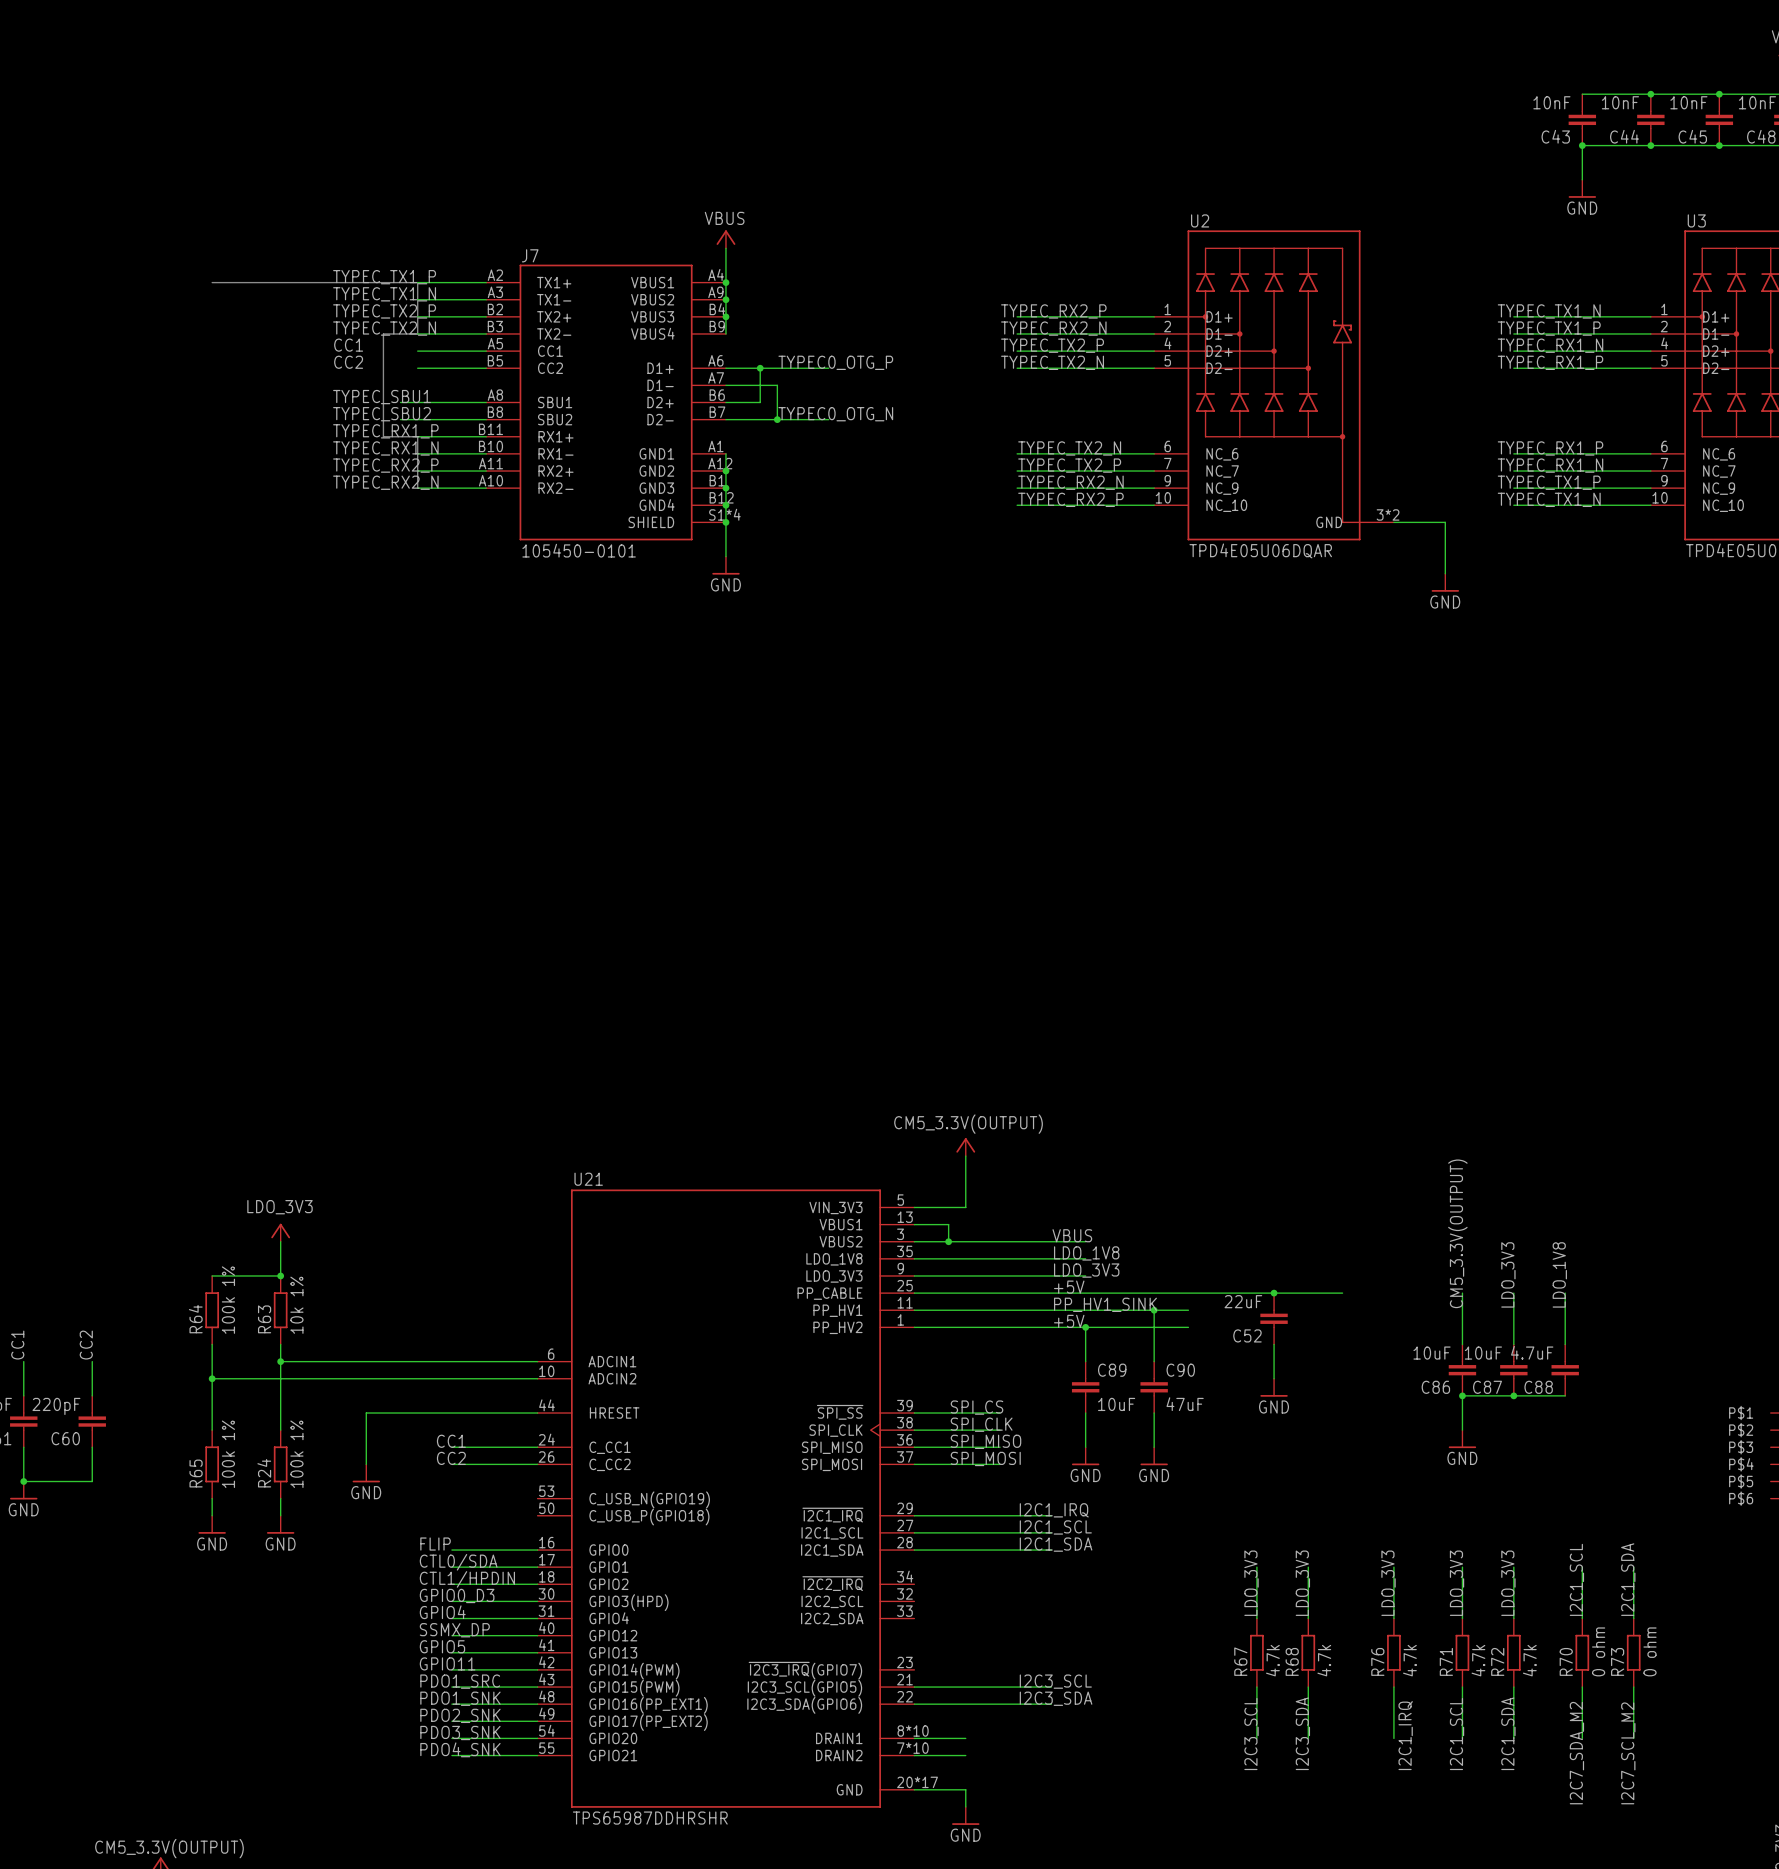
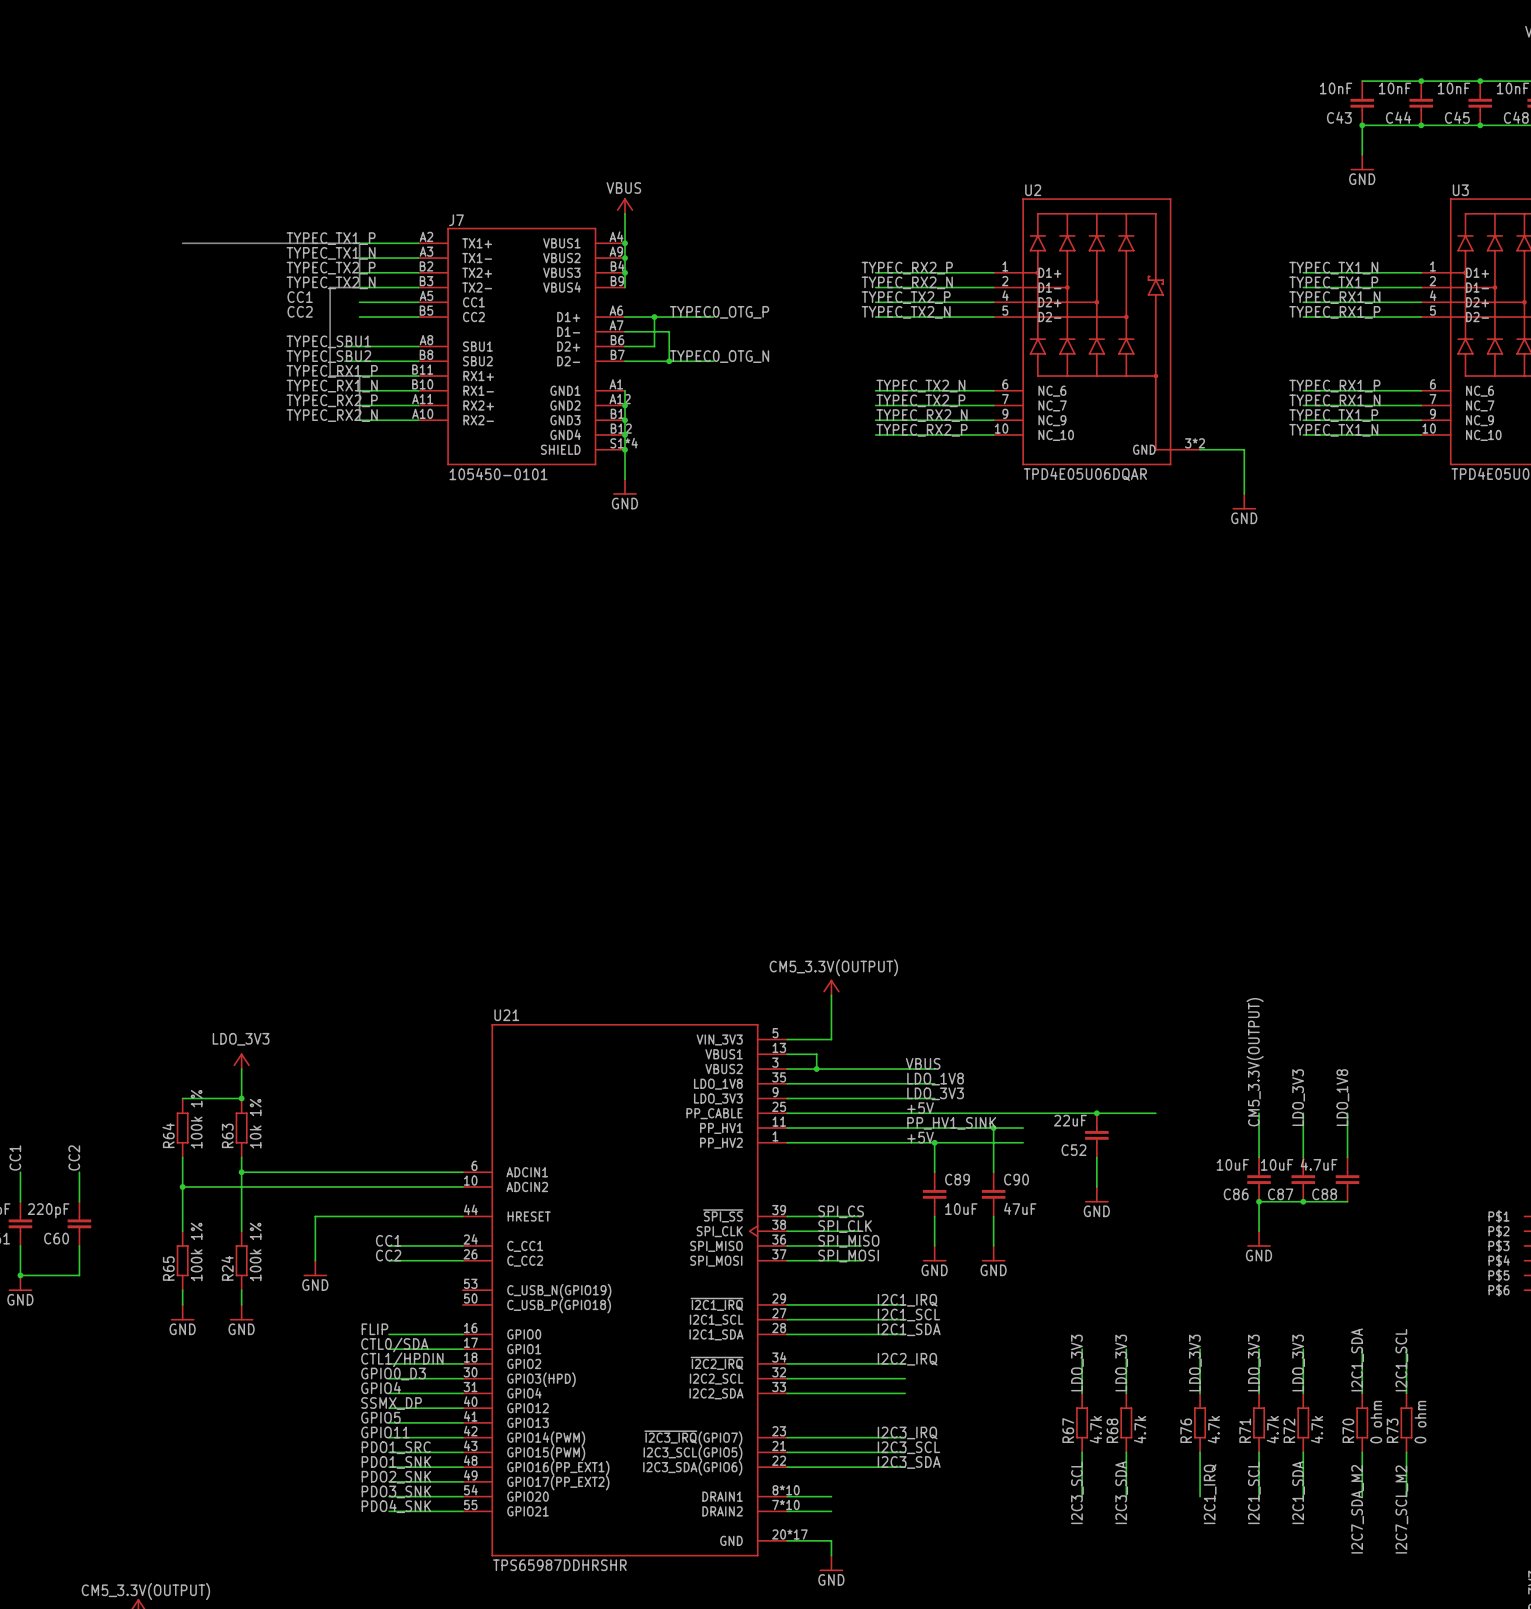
label: none -> I2C2_IRQ (907, 1359)
label: I2C1_SCL (1576, 1579) -> I2C1_SDA (1357, 1359)
label: I2C1_SDA (1628, 1579) -> I2C1_SCL (1401, 1360)
wire: none -> (787, 1363) (905, 1363)
wire: none -> (787, 1378) (905, 1378)
wire: none -> (787, 1393) (905, 1393)
label: none -> I2C3_IRQ (907, 1432)
wire: none -> (787, 1437) (905, 1437)

